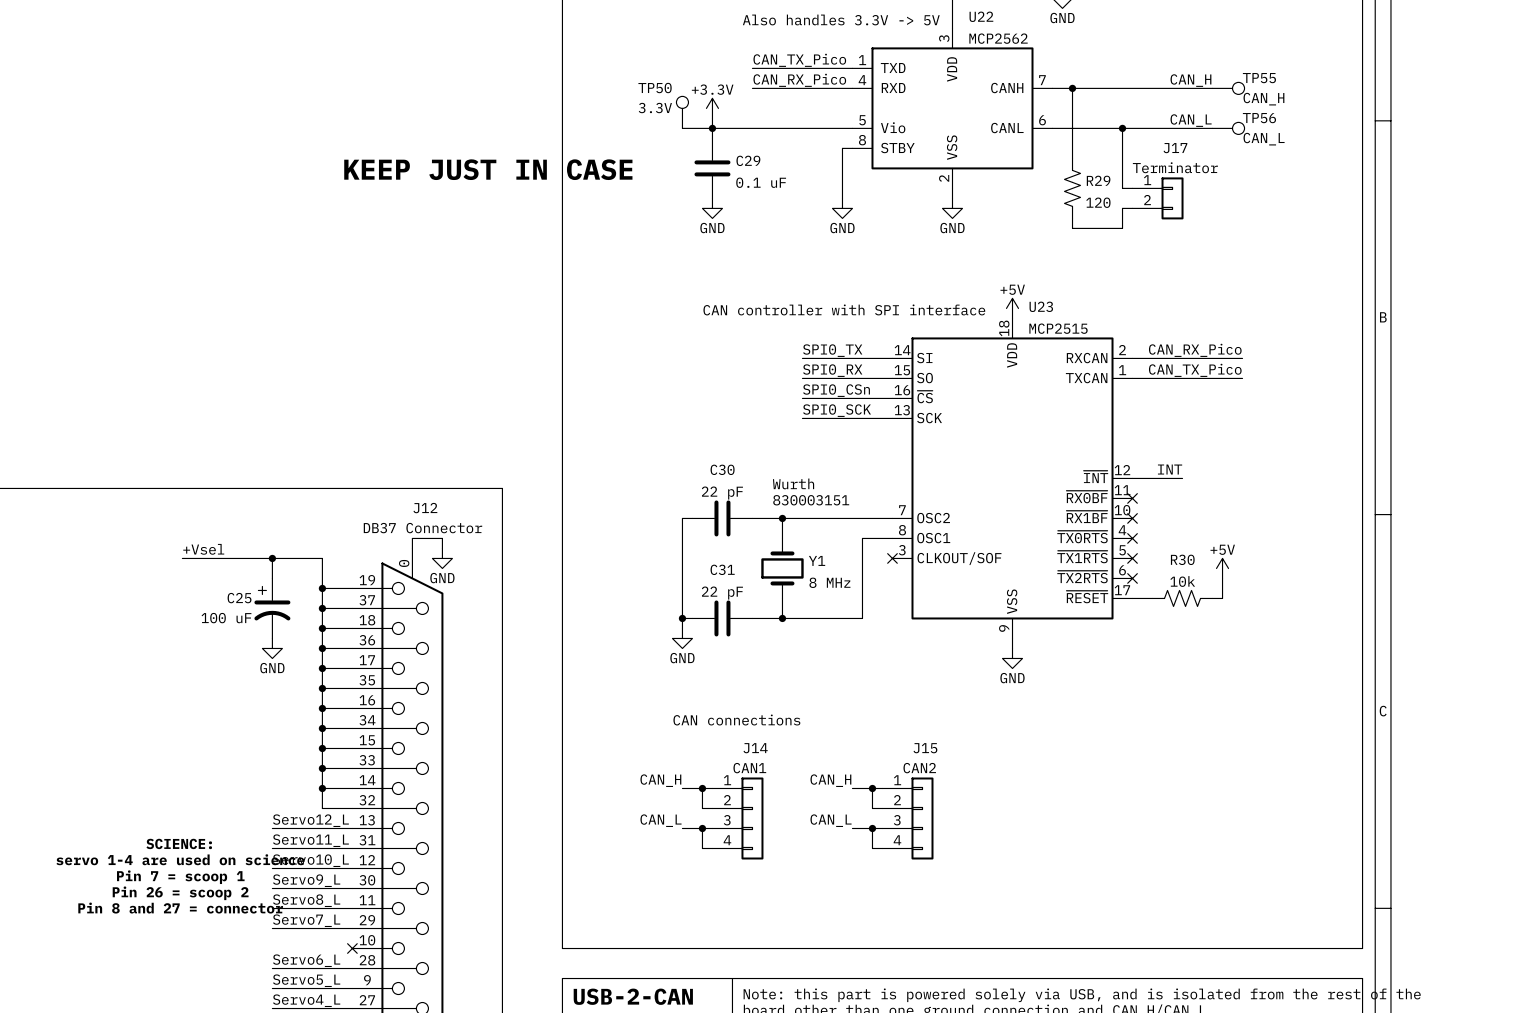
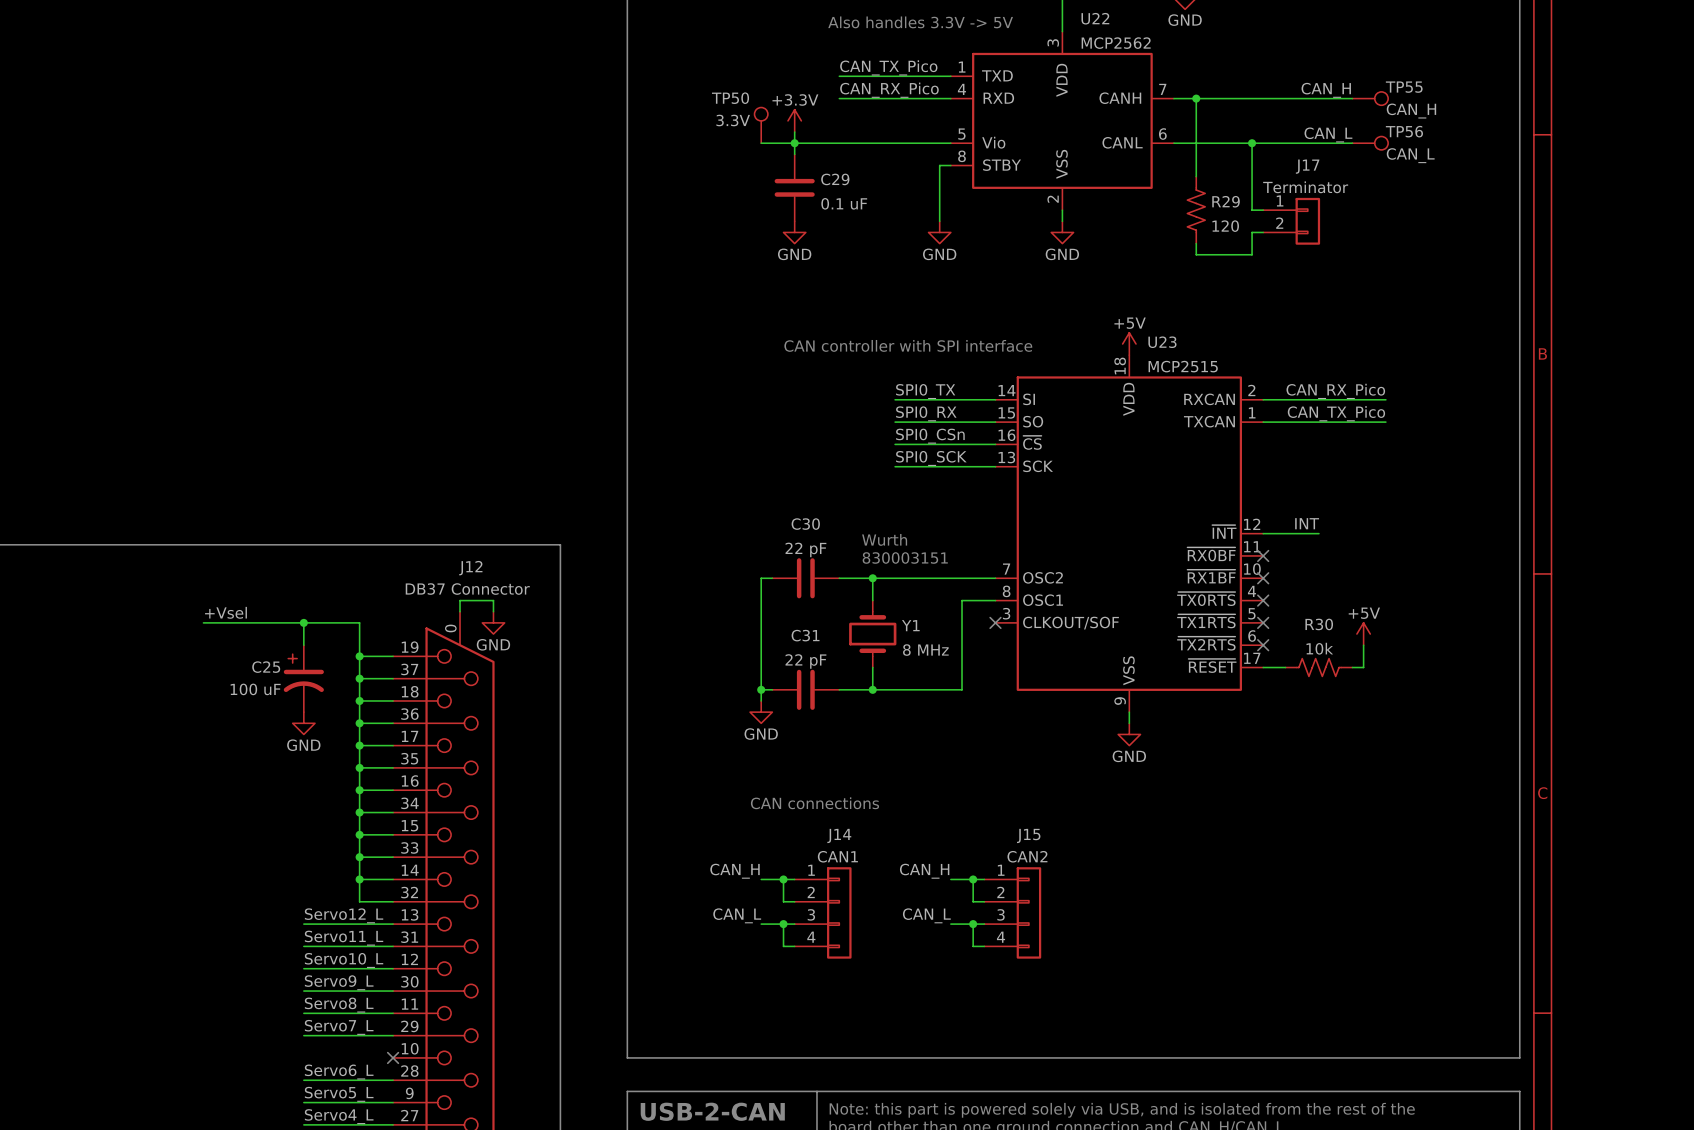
text: KEEP JUST IN CASE (488, 169) -> none
text: SCIENCE: (179, 843) -> none
text: servo 1-4 are used on science (180, 859) -> none
text: Pin 7 = scoop 1 (180, 877) -> none
text: Pin 26 = scoop 2 (180, 893) -> none
text: Pin 8 and 27 = connector (180, 908) -> none

